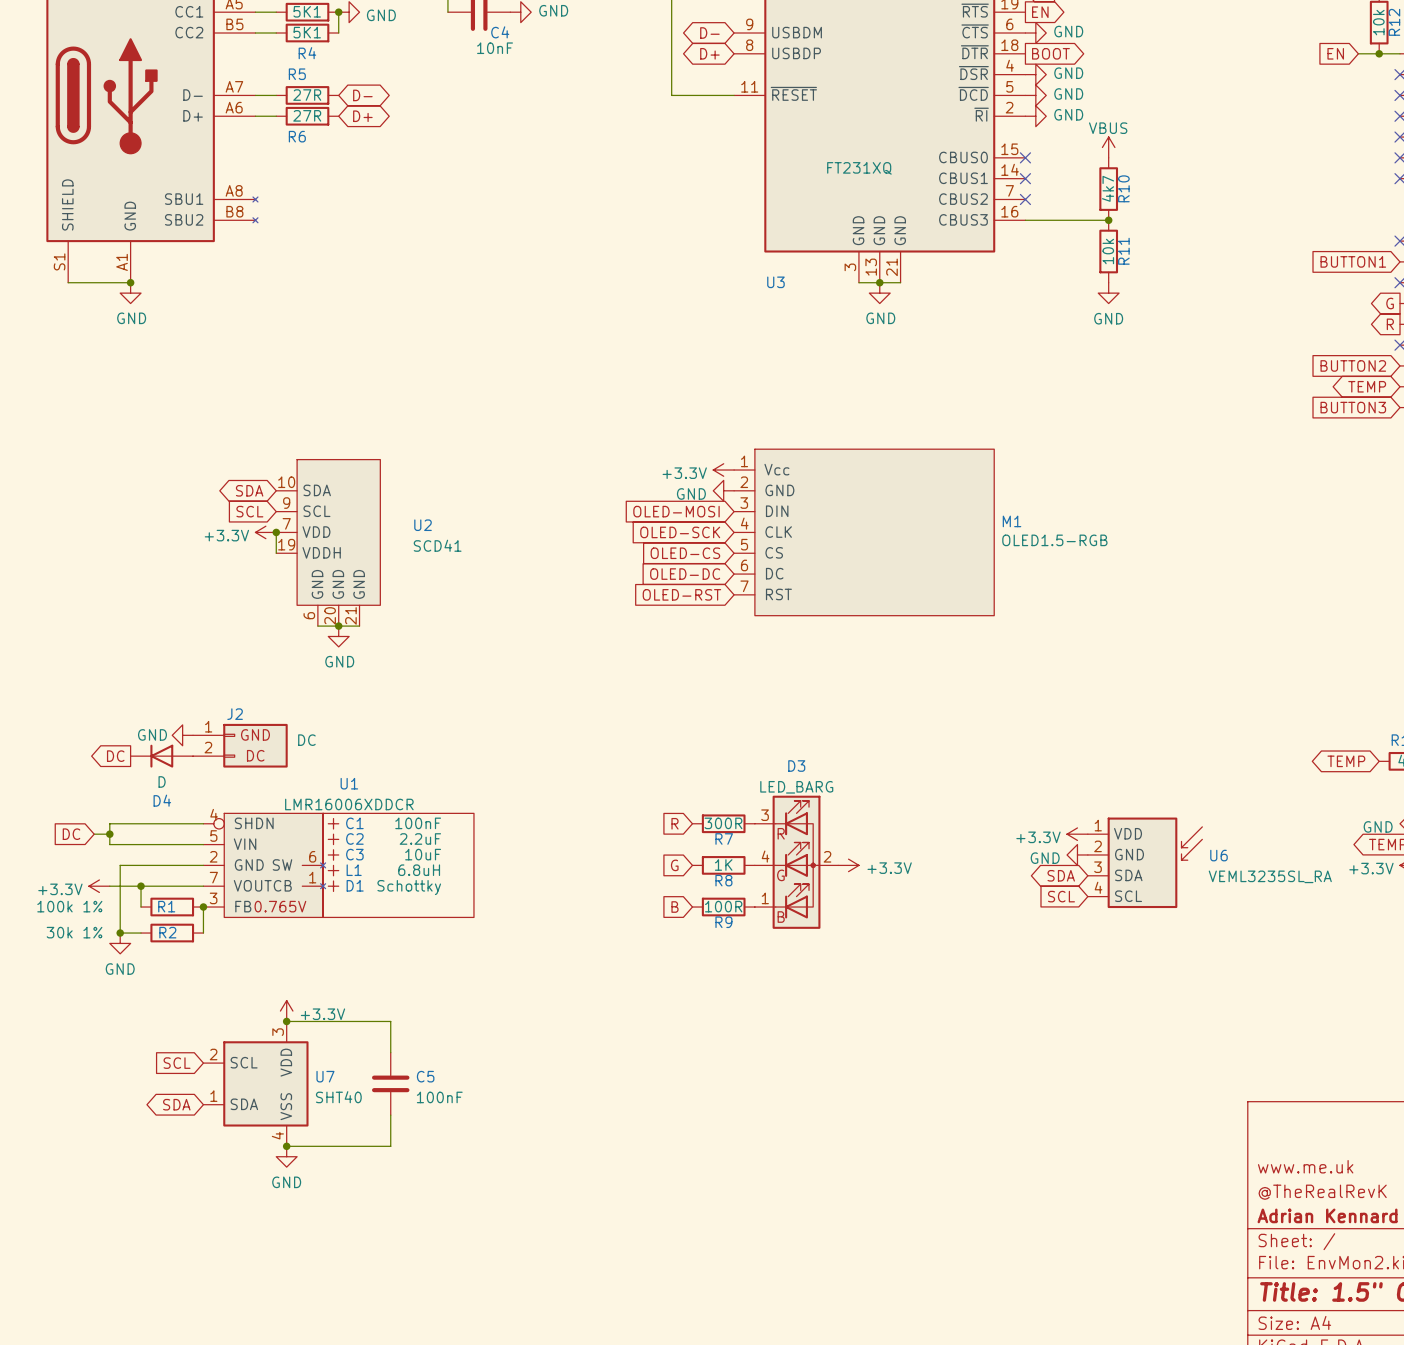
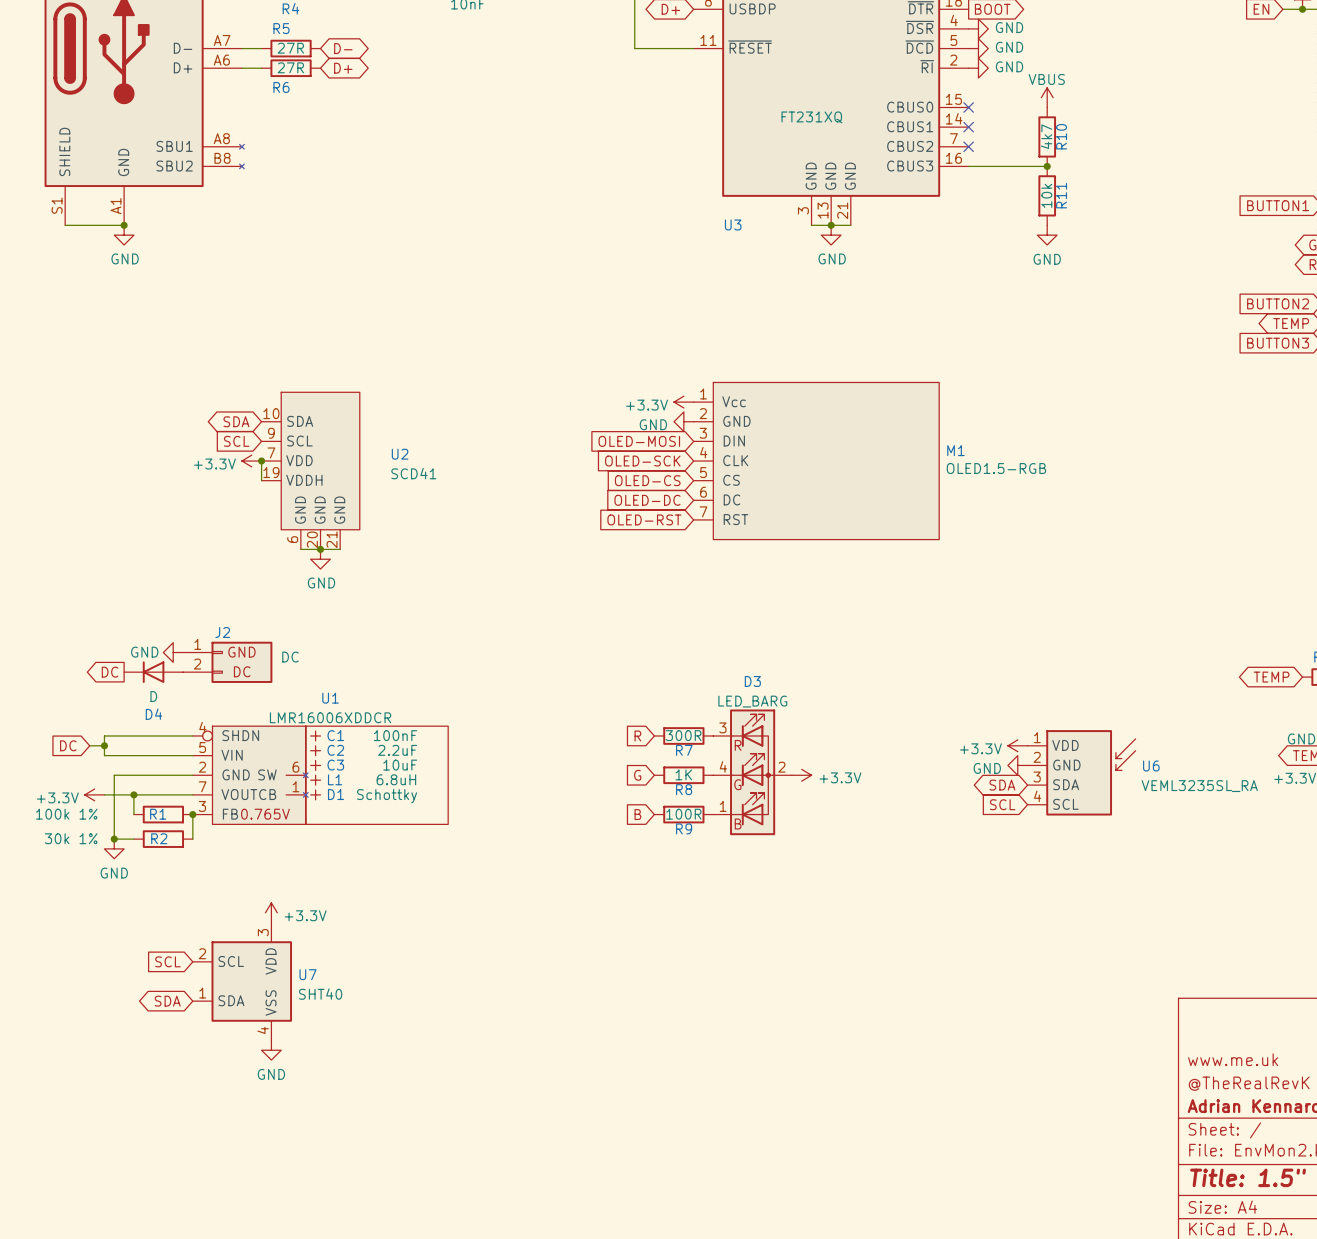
wire: (286, 1021) (390, 1021) (390, 1052) -> none
junction: (286, 1021) -> none
C5: 100nF (390, 1083) -> none
wire: (390, 1115) (390, 1146) (286, 1146) -> none
junction: (286, 1146) -> none

